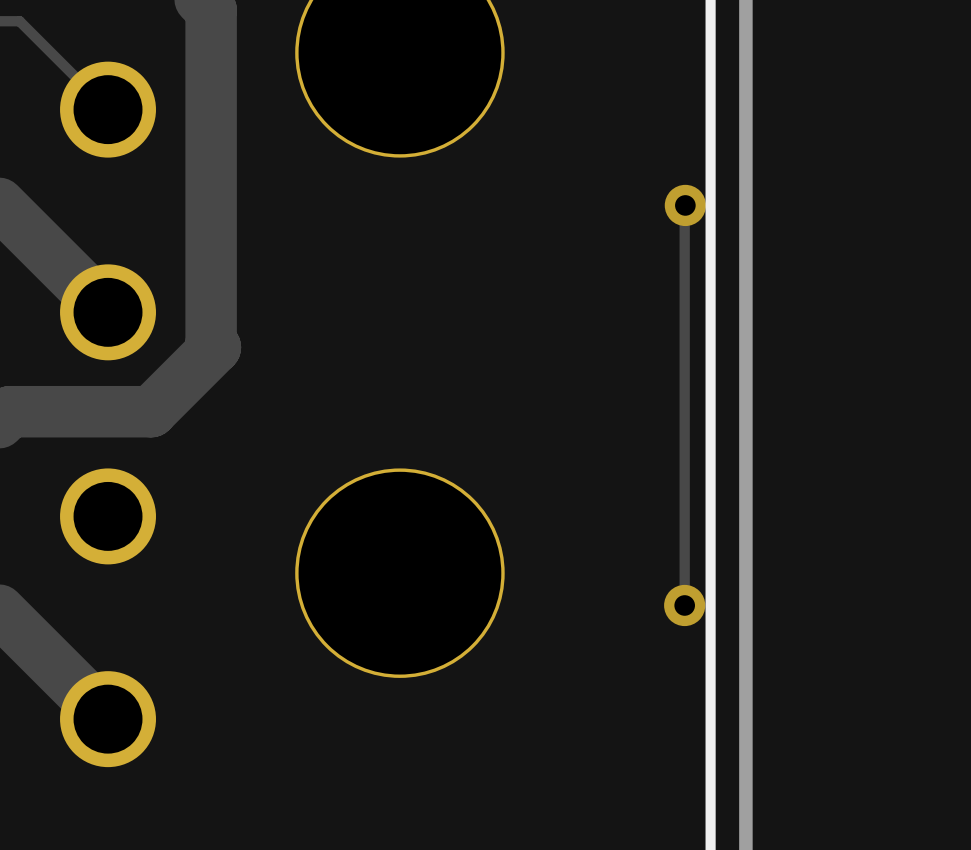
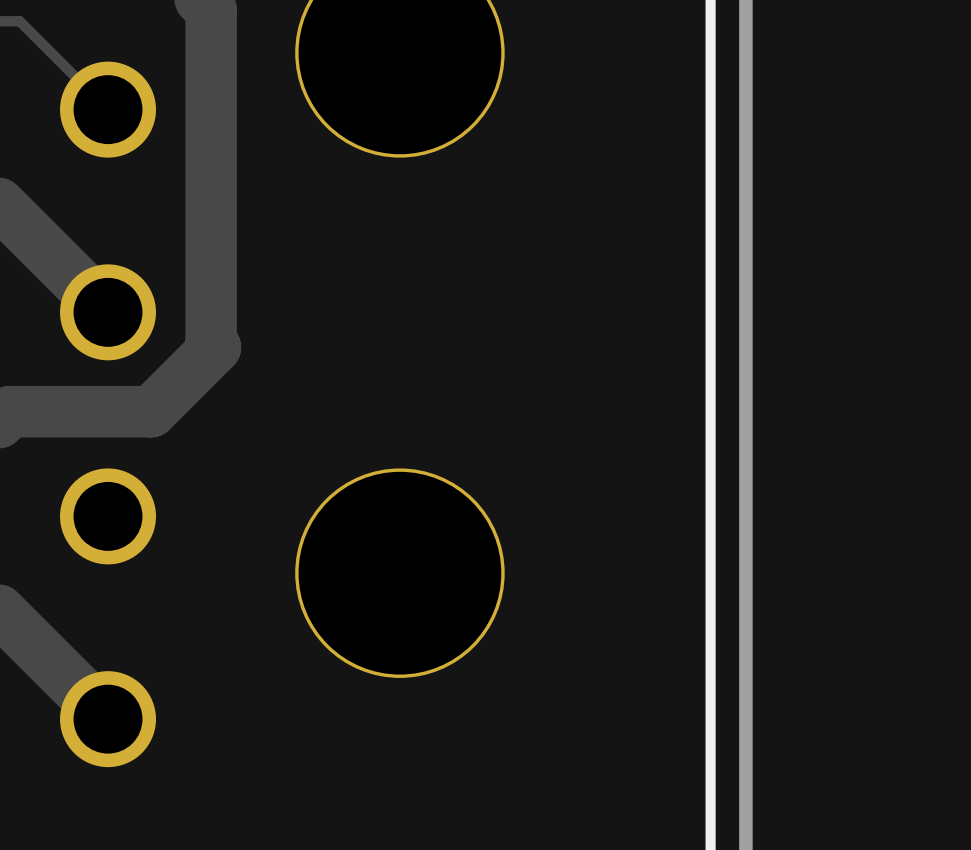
via: (685, 205) -> none
track: (684, 206) (684, 605) -> none
via: (684, 605) -> none

